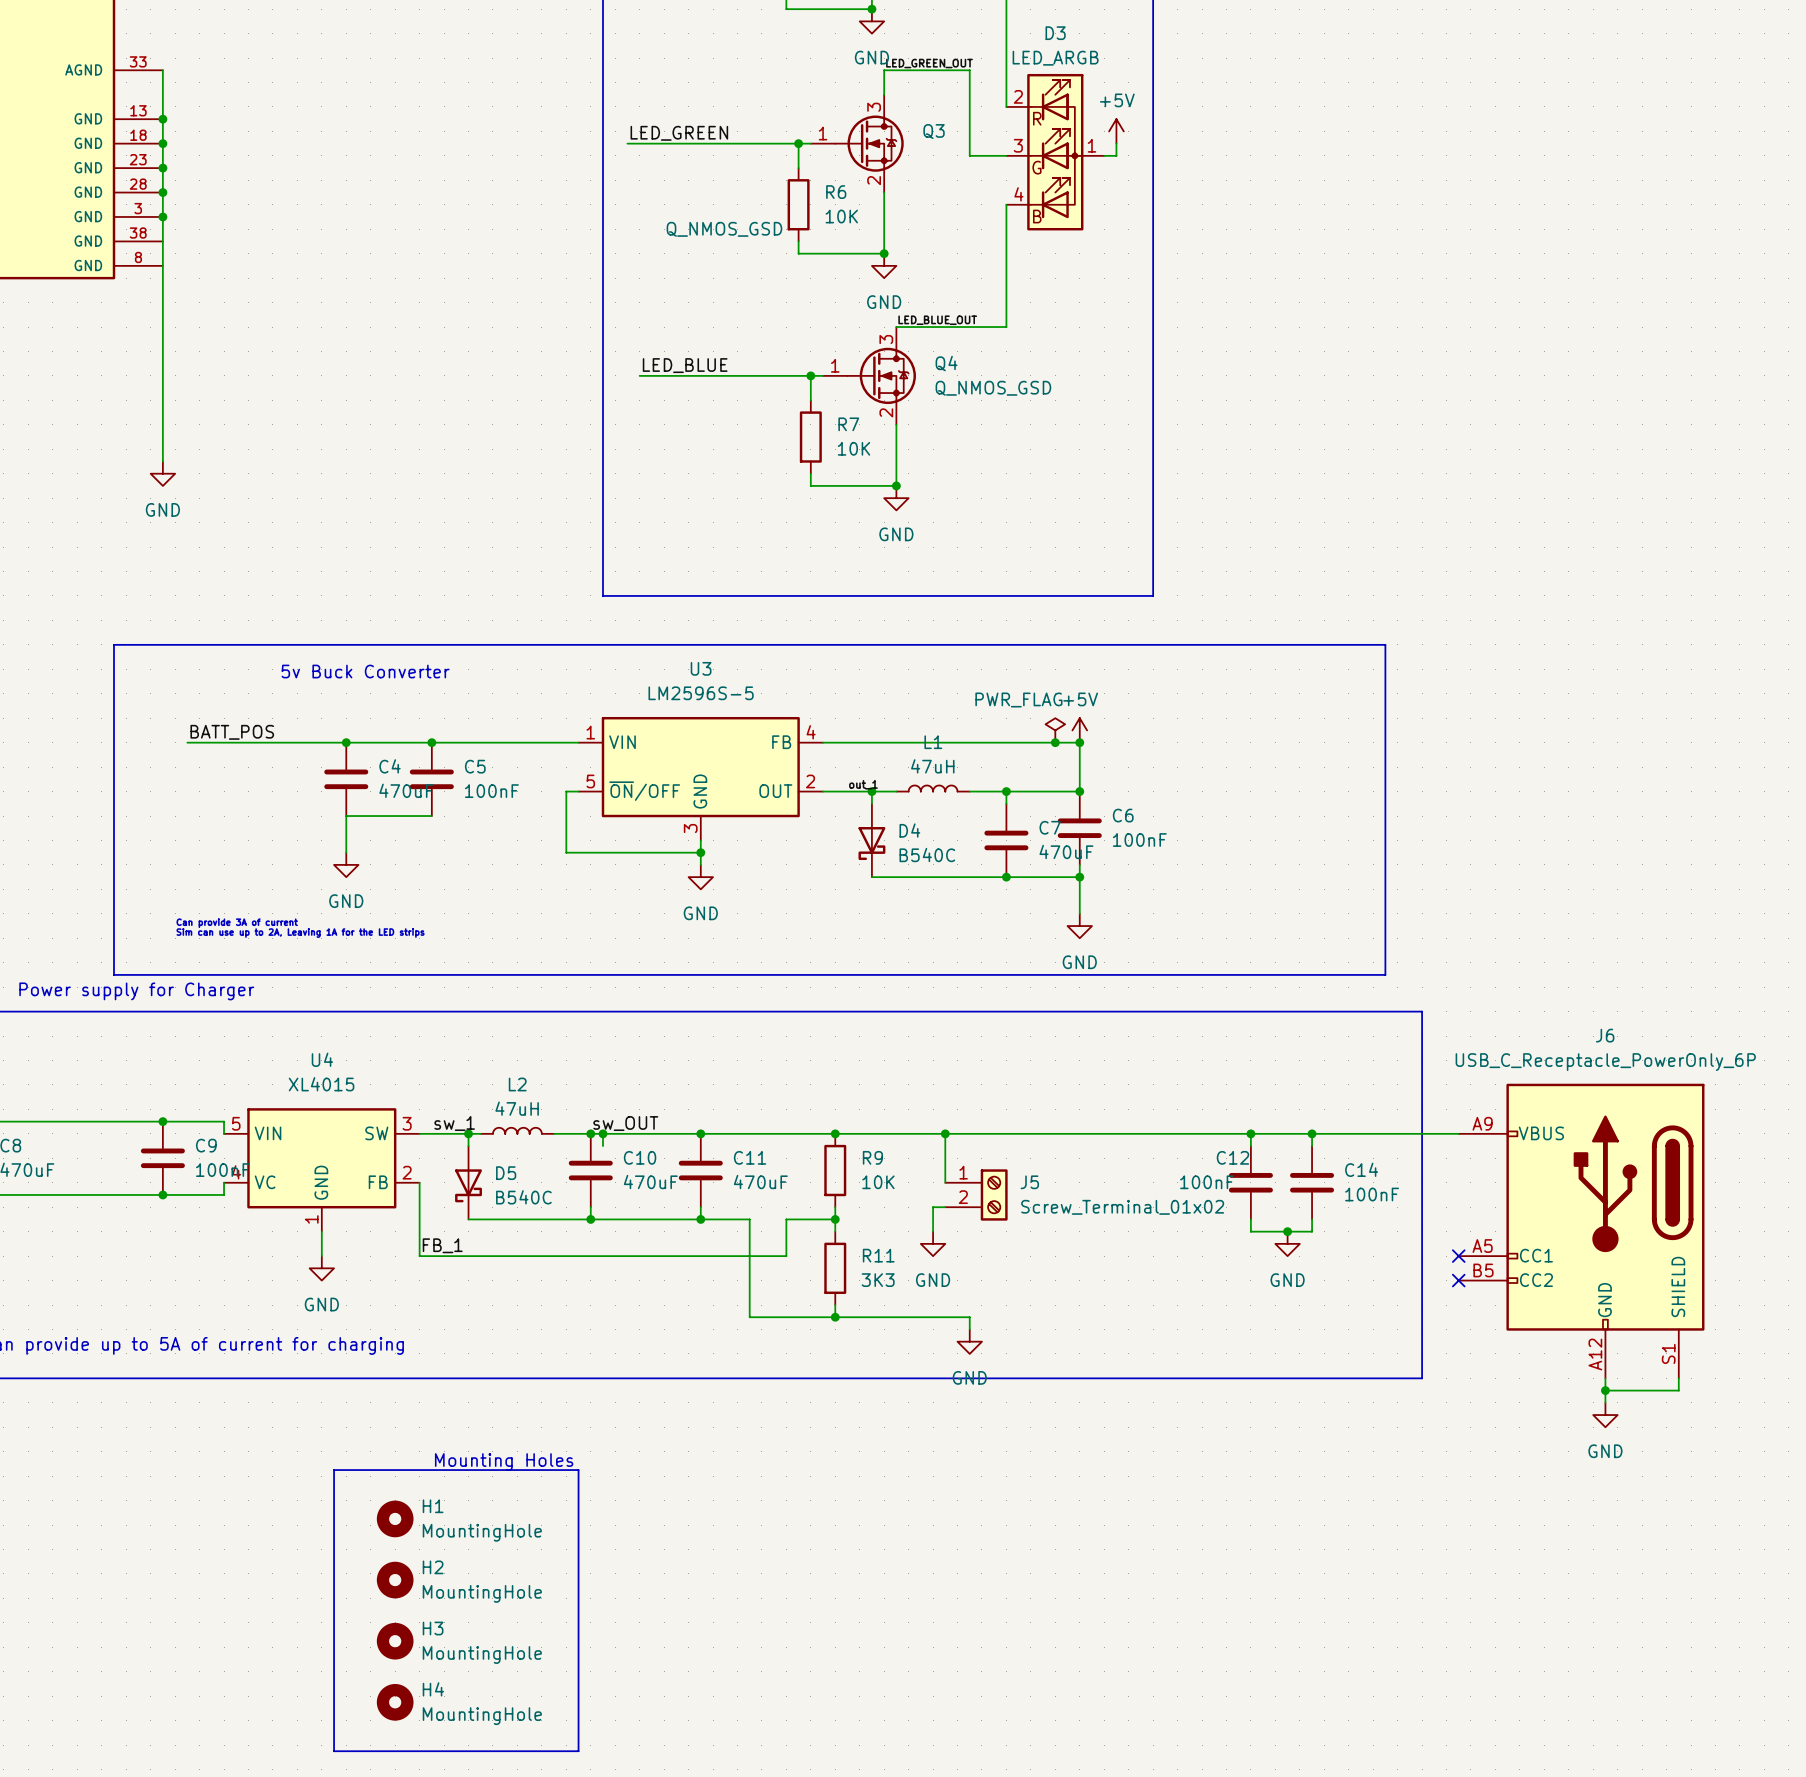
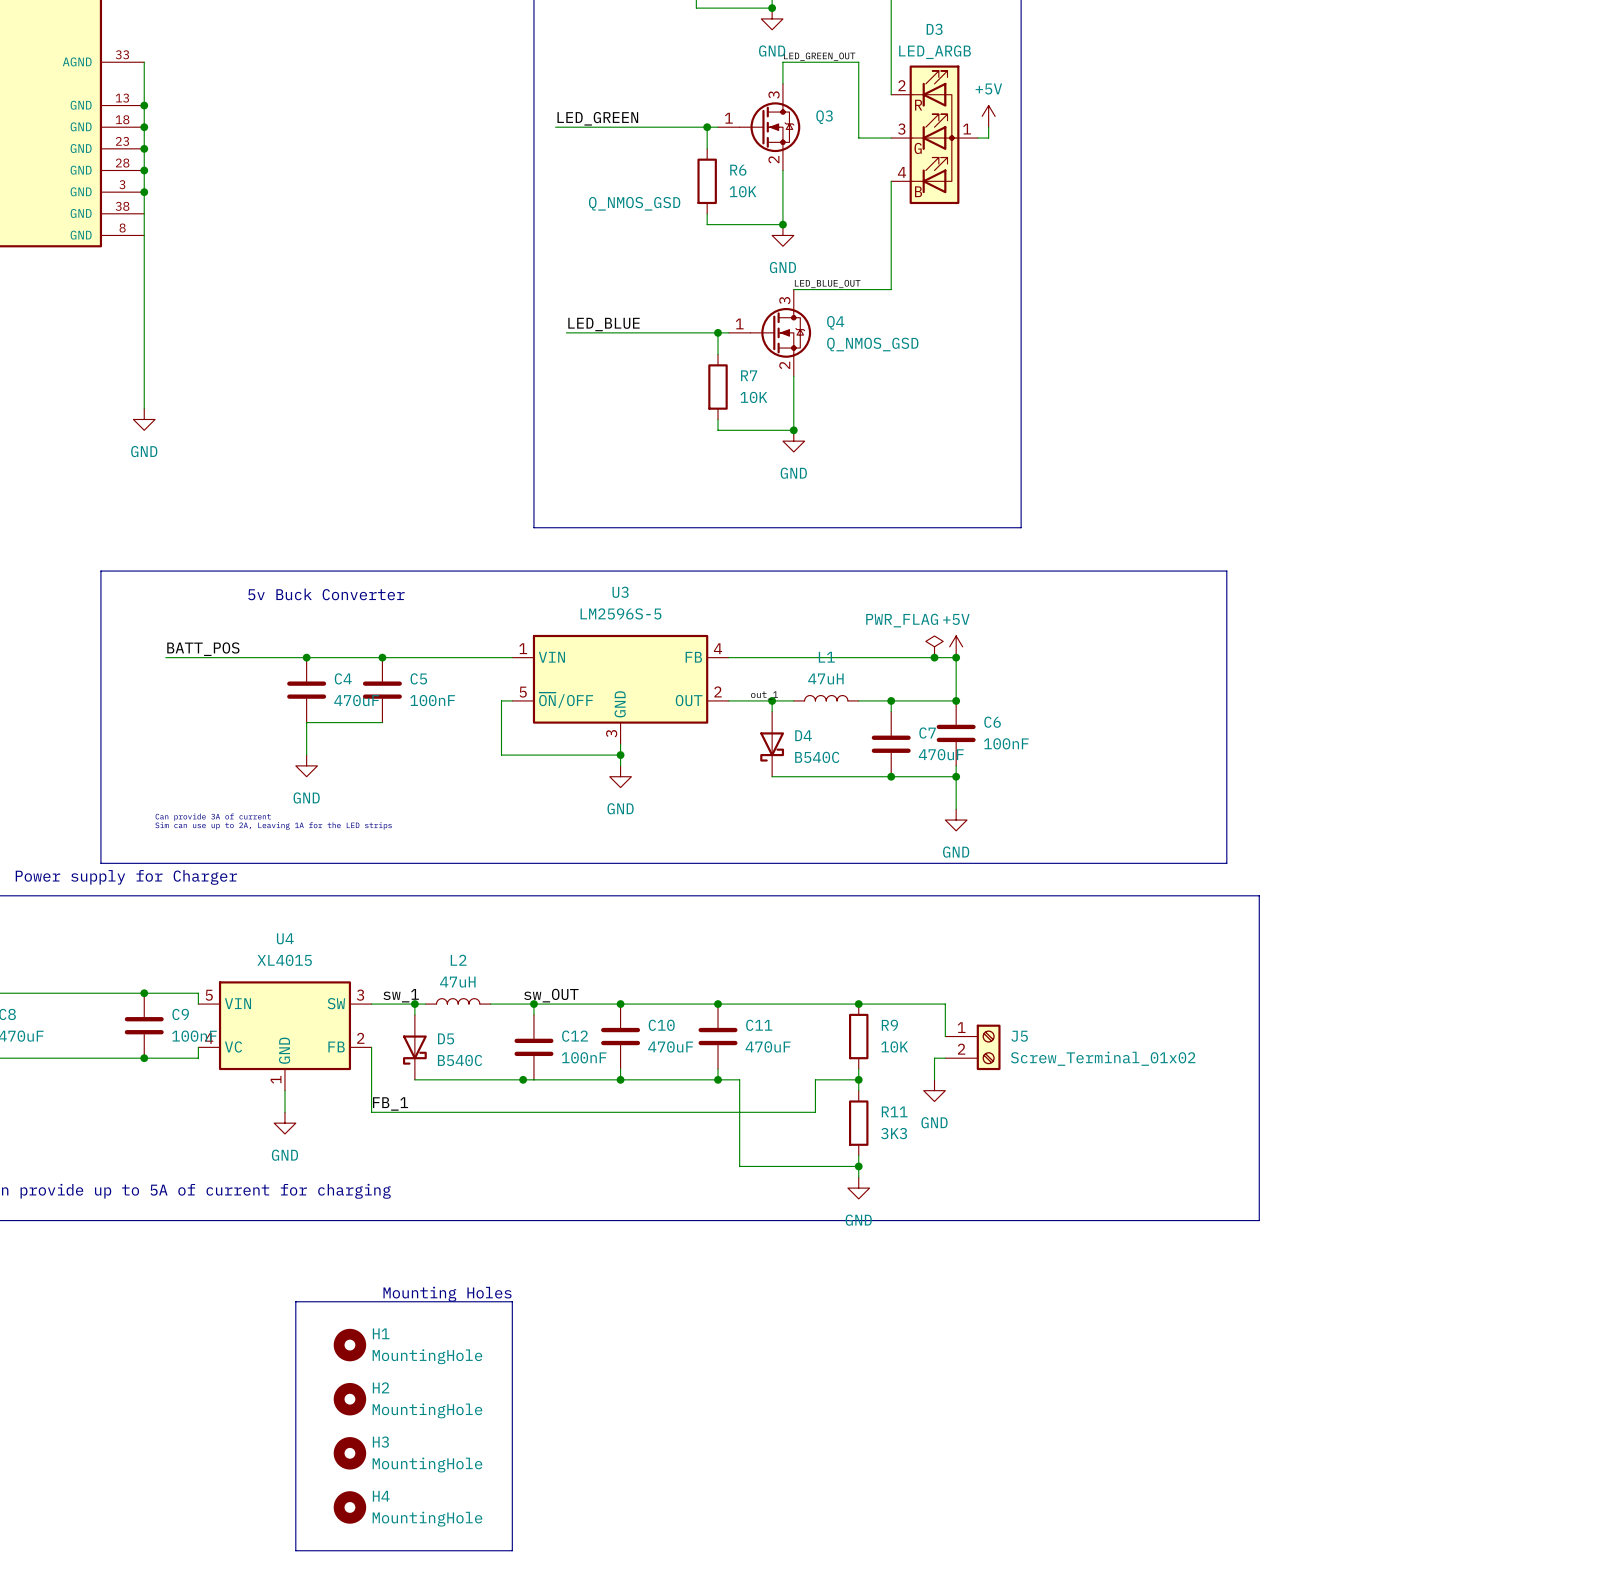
junction: (590, 1133) -> none
junction position: (835, 1133) -> (718, 1004)
wire: (945, 1133) (945, 1182) -> none
junction position: (945, 1133) -> (858, 1004)
wire: (1067, 1133) (1458, 1133) -> (945, 1004) (945, 1036)
wire: (1250, 1133) (1250, 1146) -> none
junction: (1250, 1133) -> none
wire: (1312, 1133) (1312, 1146) -> none
junction: (1312, 1133) -> none
C11 name: C11 (750, 1157) -> C10 (661, 1025)
C12 name position: C12 (1232, 1157) -> C12 (575, 1036)
C10: 470uF (590, 1170) -> none
C11: none -> 470uF (718, 1036)
R9 position: (835, 1170) -> (858, 1036)
C12 value position: 100nF (1207, 1182) -> 100nF (584, 1057)
C12 position: (1250, 1182) -> (533, 1047)
C14: 100nF (1312, 1182) -> none
J5 position: (976, 1194) -> (972, 1047)
wire: (590, 1207) (590, 1219) -> none
wire: (835, 1207) (835, 1219) -> (718, 1069) (718, 1079)
wire: (945, 1207) (933, 1207) (933, 1231) -> (945, 1058) (934, 1058) (934, 1079)
wire: none -> (858, 1069) (858, 1090)
wire: (749, 1219) (749, 1317) (835, 1317) -> none
wire: (786, 1219) (786, 1256) -> (696, 1079) (663, 1079)
junction position: (835, 1219) -> (718, 1079)
wire: none -> (858, 1079) (815, 1079) (815, 1112) (696, 1112)
junction: none -> (858, 1079)
wire: (1250, 1219) (1250, 1231) (1312, 1231) (1312, 1219) -> none
wire: none -> (739, 1090) (739, 1155)
power symbol: none -> GND (934, 1090)
junction: (1287, 1231) -> none
J6: USB_C_Receptacle_PowerOnly_6P (1581, 1231) -> none
power symbol: GND (933, 1243) -> none
power symbol: GND (1287, 1243) -> none
no-connect mark: (1458, 1256) -> none
R11 position: (835, 1268) -> (858, 1123)
no-connect mark: (1458, 1280) -> none
wire: none -> (858, 1155) (858, 1166)
junction: (835, 1317) -> none
junction: none -> (858, 1166)
wire: (1605, 1378) (1605, 1402) -> none
wire: (1678, 1378) (1678, 1390) (1605, 1390) -> none
junction: (1605, 1390) -> none
power symbol: GND (1605, 1415) -> none

